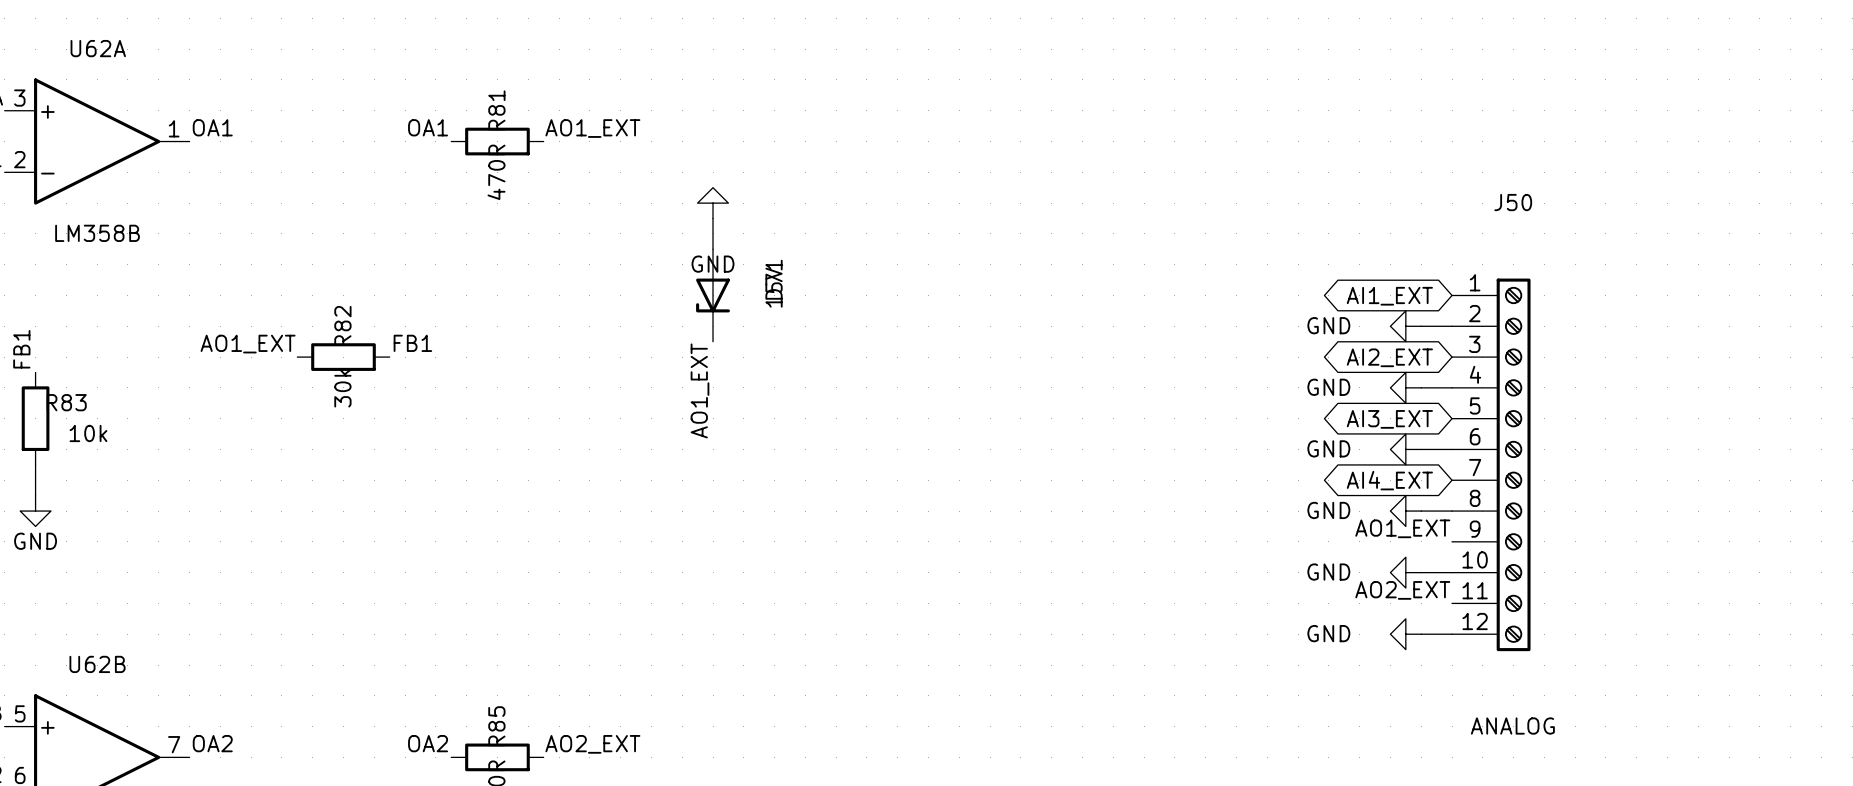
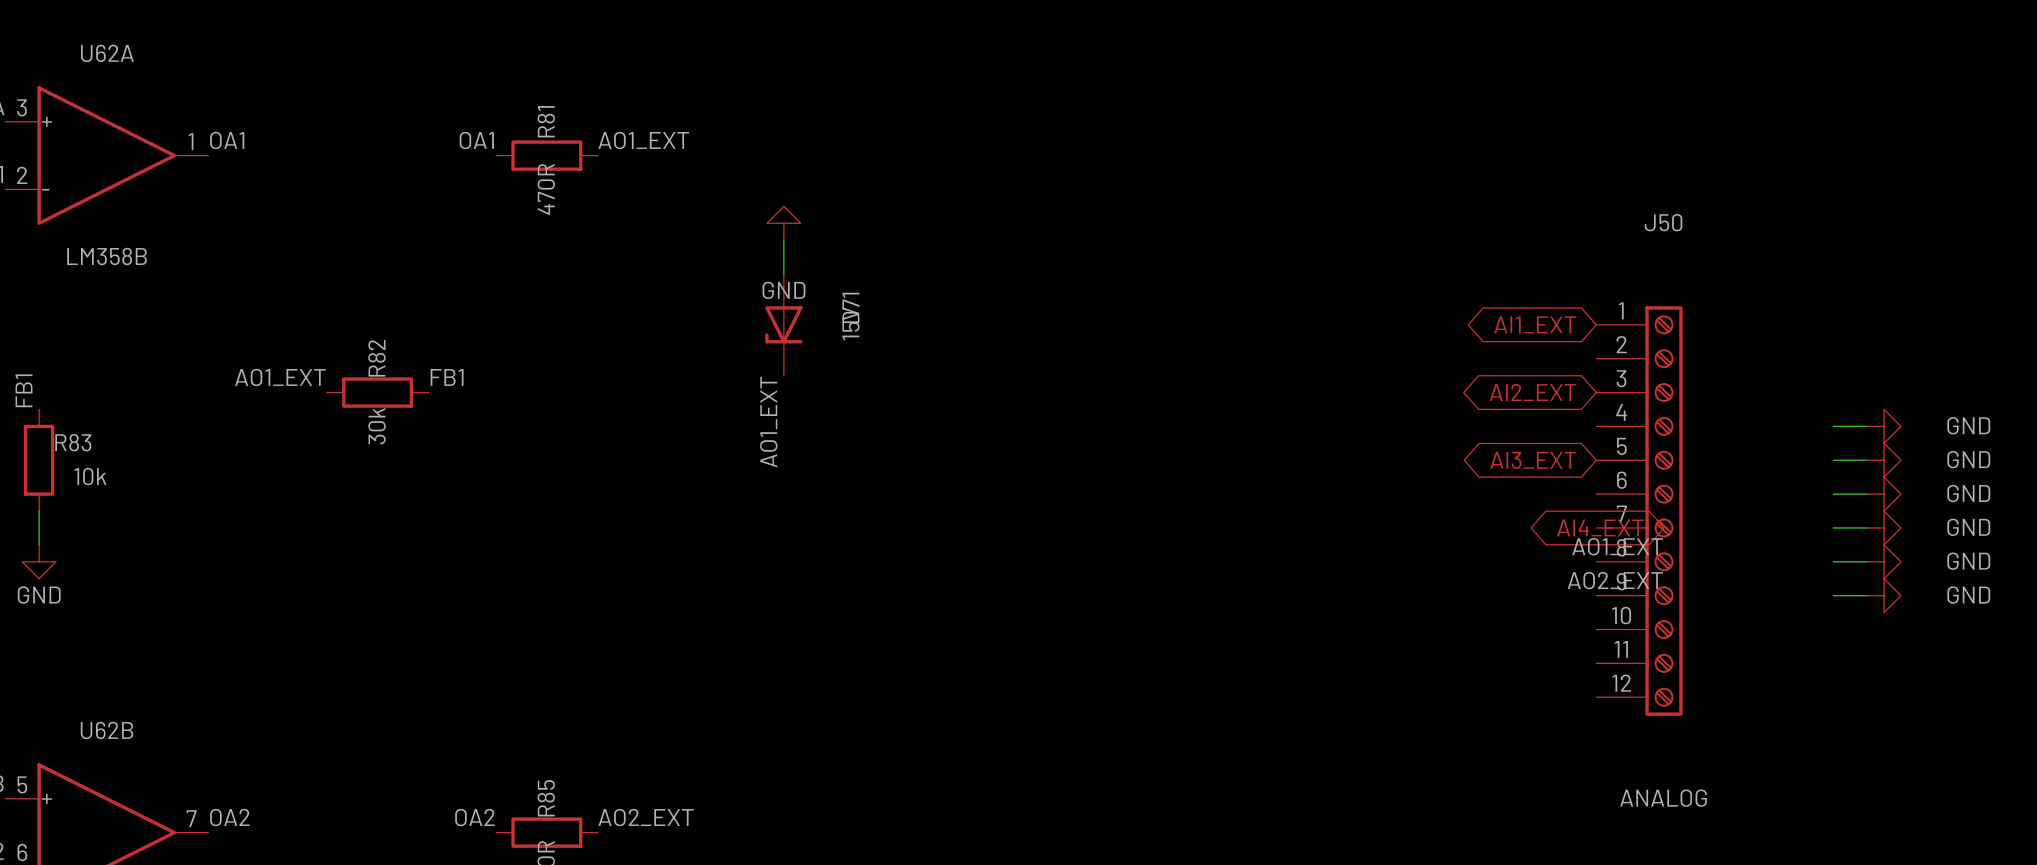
power symbol: GND (1405, 326) -> none
wire: (1421, 326) (1452, 326) -> (1833, 460) (1867, 460)
power symbol: GND (1405, 387) -> none
wire: (1421, 387) (1452, 387) -> (1833, 426) (1867, 426)
power symbol: none -> GND (1884, 426)
power symbol: none -> GND (1884, 460)
power symbol: GND (1405, 449) -> none
wire: (1421, 449) (1452, 449) -> (1833, 494) (1867, 494)
power symbol: none -> GND (1884, 494)
global label position: AI4_EXT (1389, 480) -> AI4_EXT (1600, 527)
power symbol: none -> GND (1884, 527)
power symbol: GND (1405, 511) -> none
wire: (1421, 511) (1452, 511) -> (1833, 561) (1867, 561)
power symbol: none -> GND (1884, 561)
label position: AO1_EXT (1402, 528) -> AO1_EXT (1617, 546)
power symbol: none -> GND (1884, 595)
power symbol: GND (1405, 572) -> none
wire: (1421, 572) (1452, 572) -> (1833, 595) (1867, 595)
label position: AO2_EXT (1402, 590) -> AO2_EXT (1615, 580)
power symbol: GND (1405, 634) -> none
wire: (1421, 634) (1452, 634) -> (1833, 527) (1867, 527)

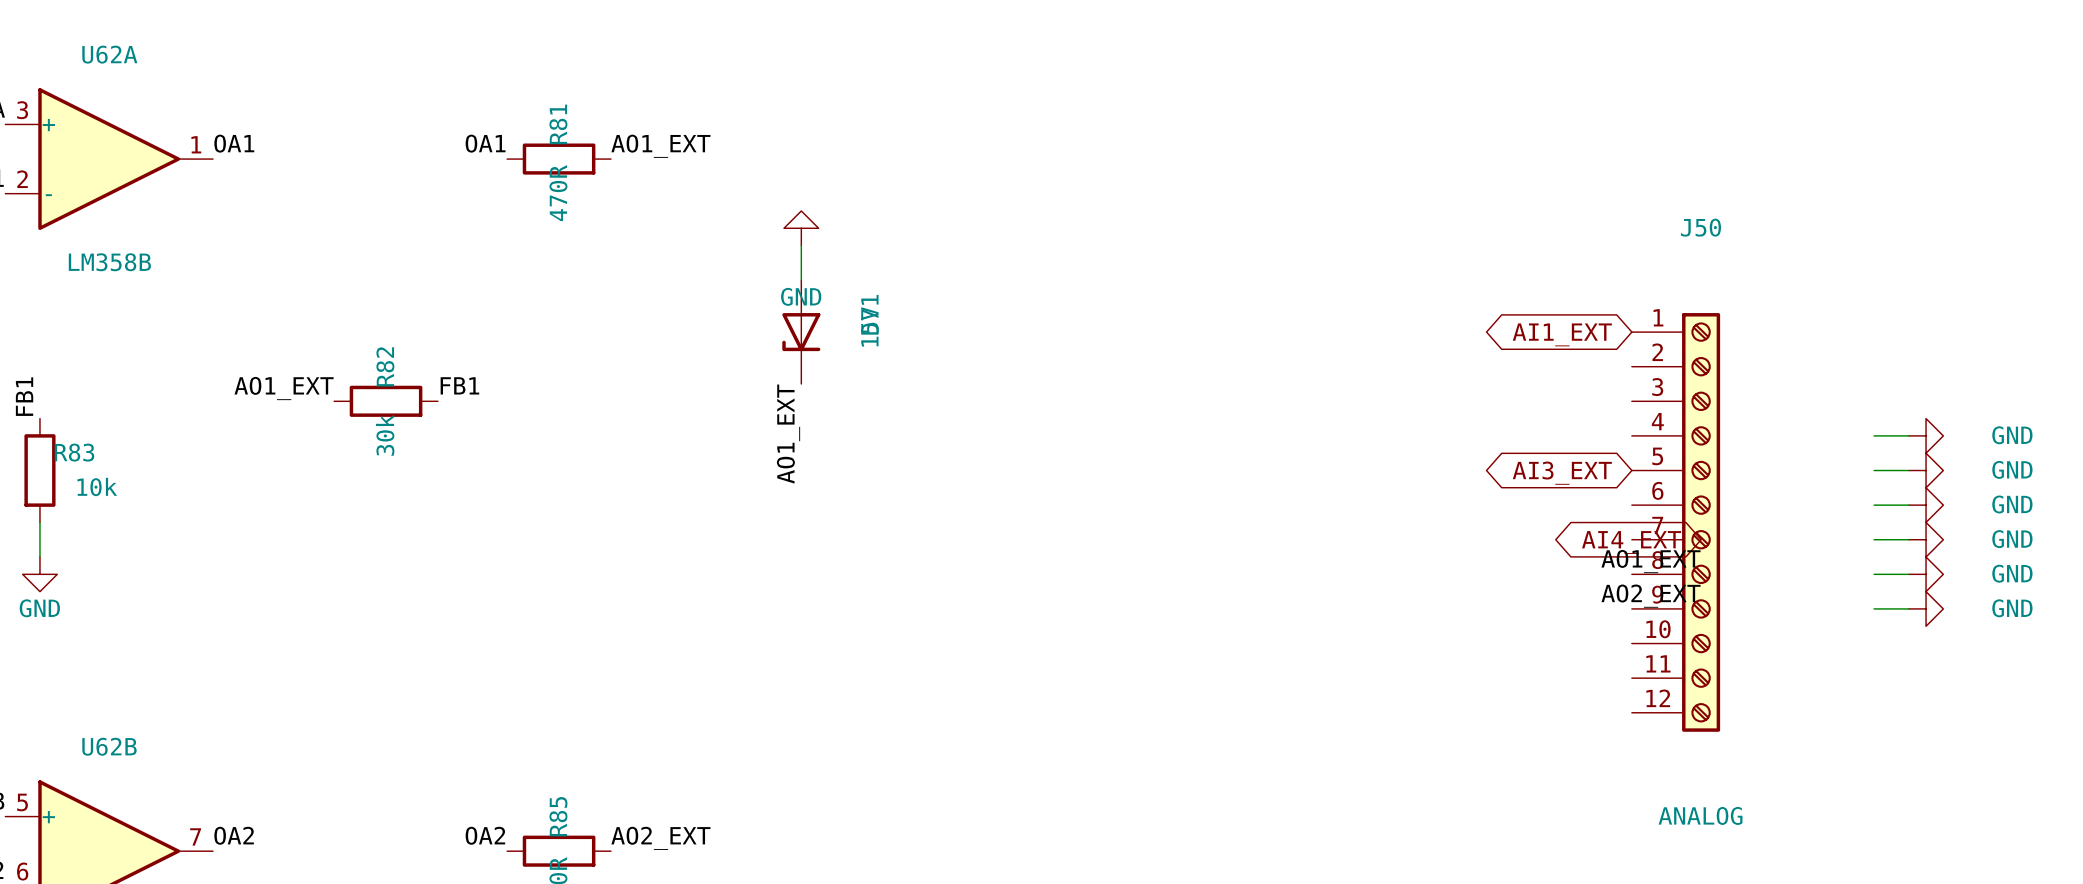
global label: AI2_EXT (1533, 392) -> none

